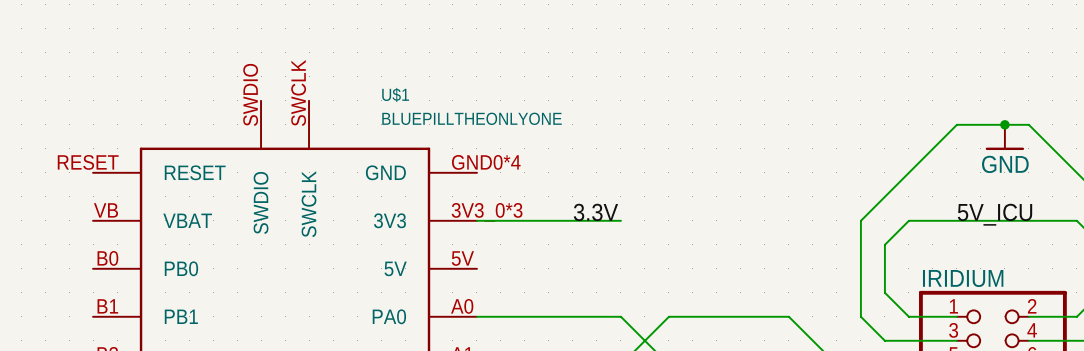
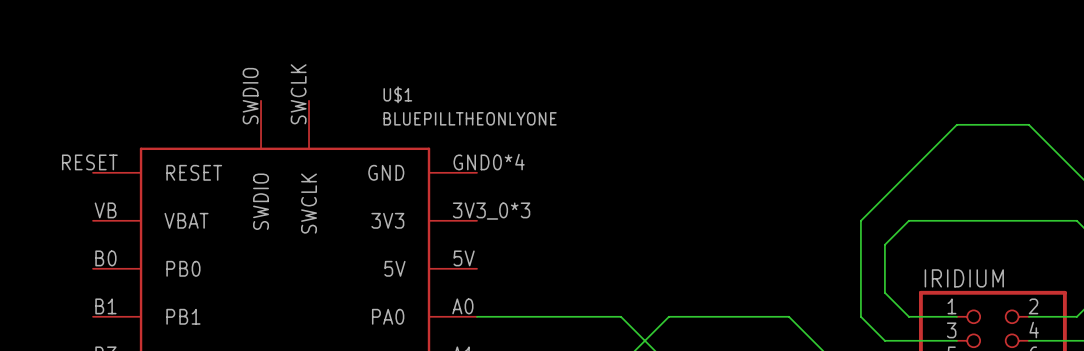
junction: (1004, 124) -> none
power symbol: GND (1004, 137) -> none
label: 3.3V (595, 212) -> none
label: 5V_ICU (994, 214) -> none
wire: (476, 220) (620, 220) -> none

